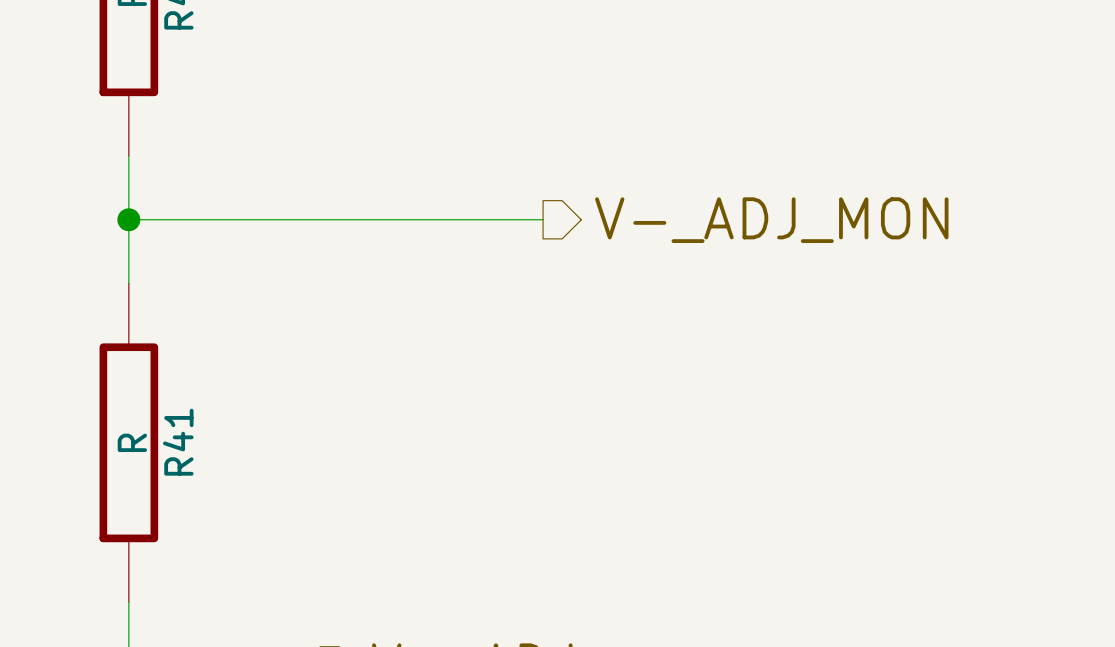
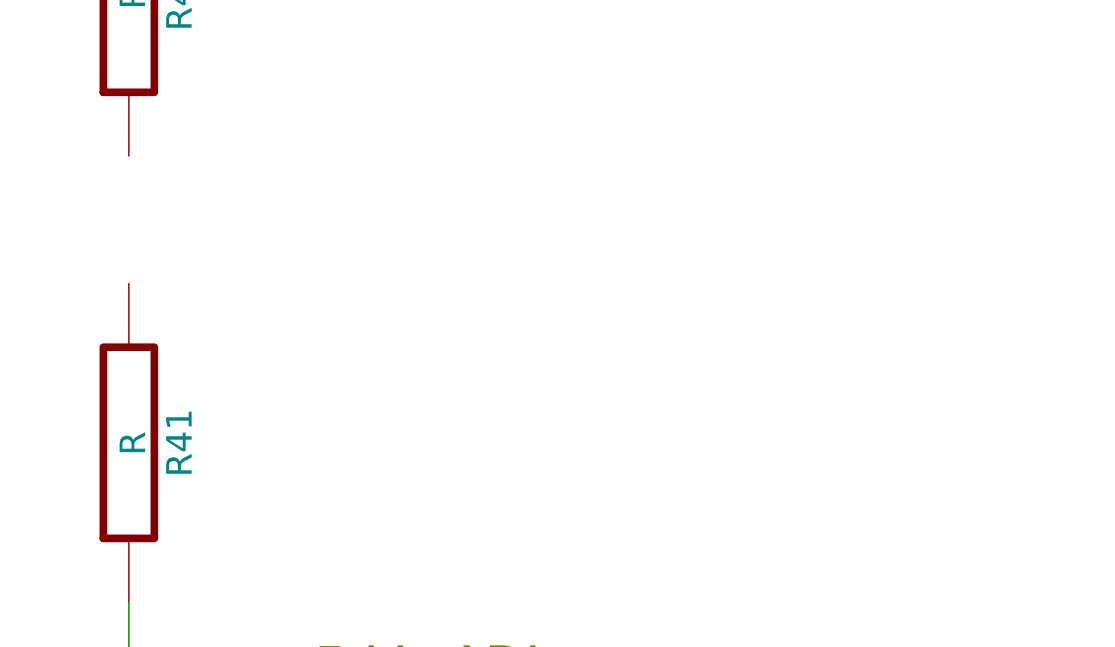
wire: (128, 156) (128, 283) -> none
wire: (128, 219) (543, 219) -> none
junction: (128, 219) -> none
hierarchical label: V-_ADJ_MON (771, 220) -> none

